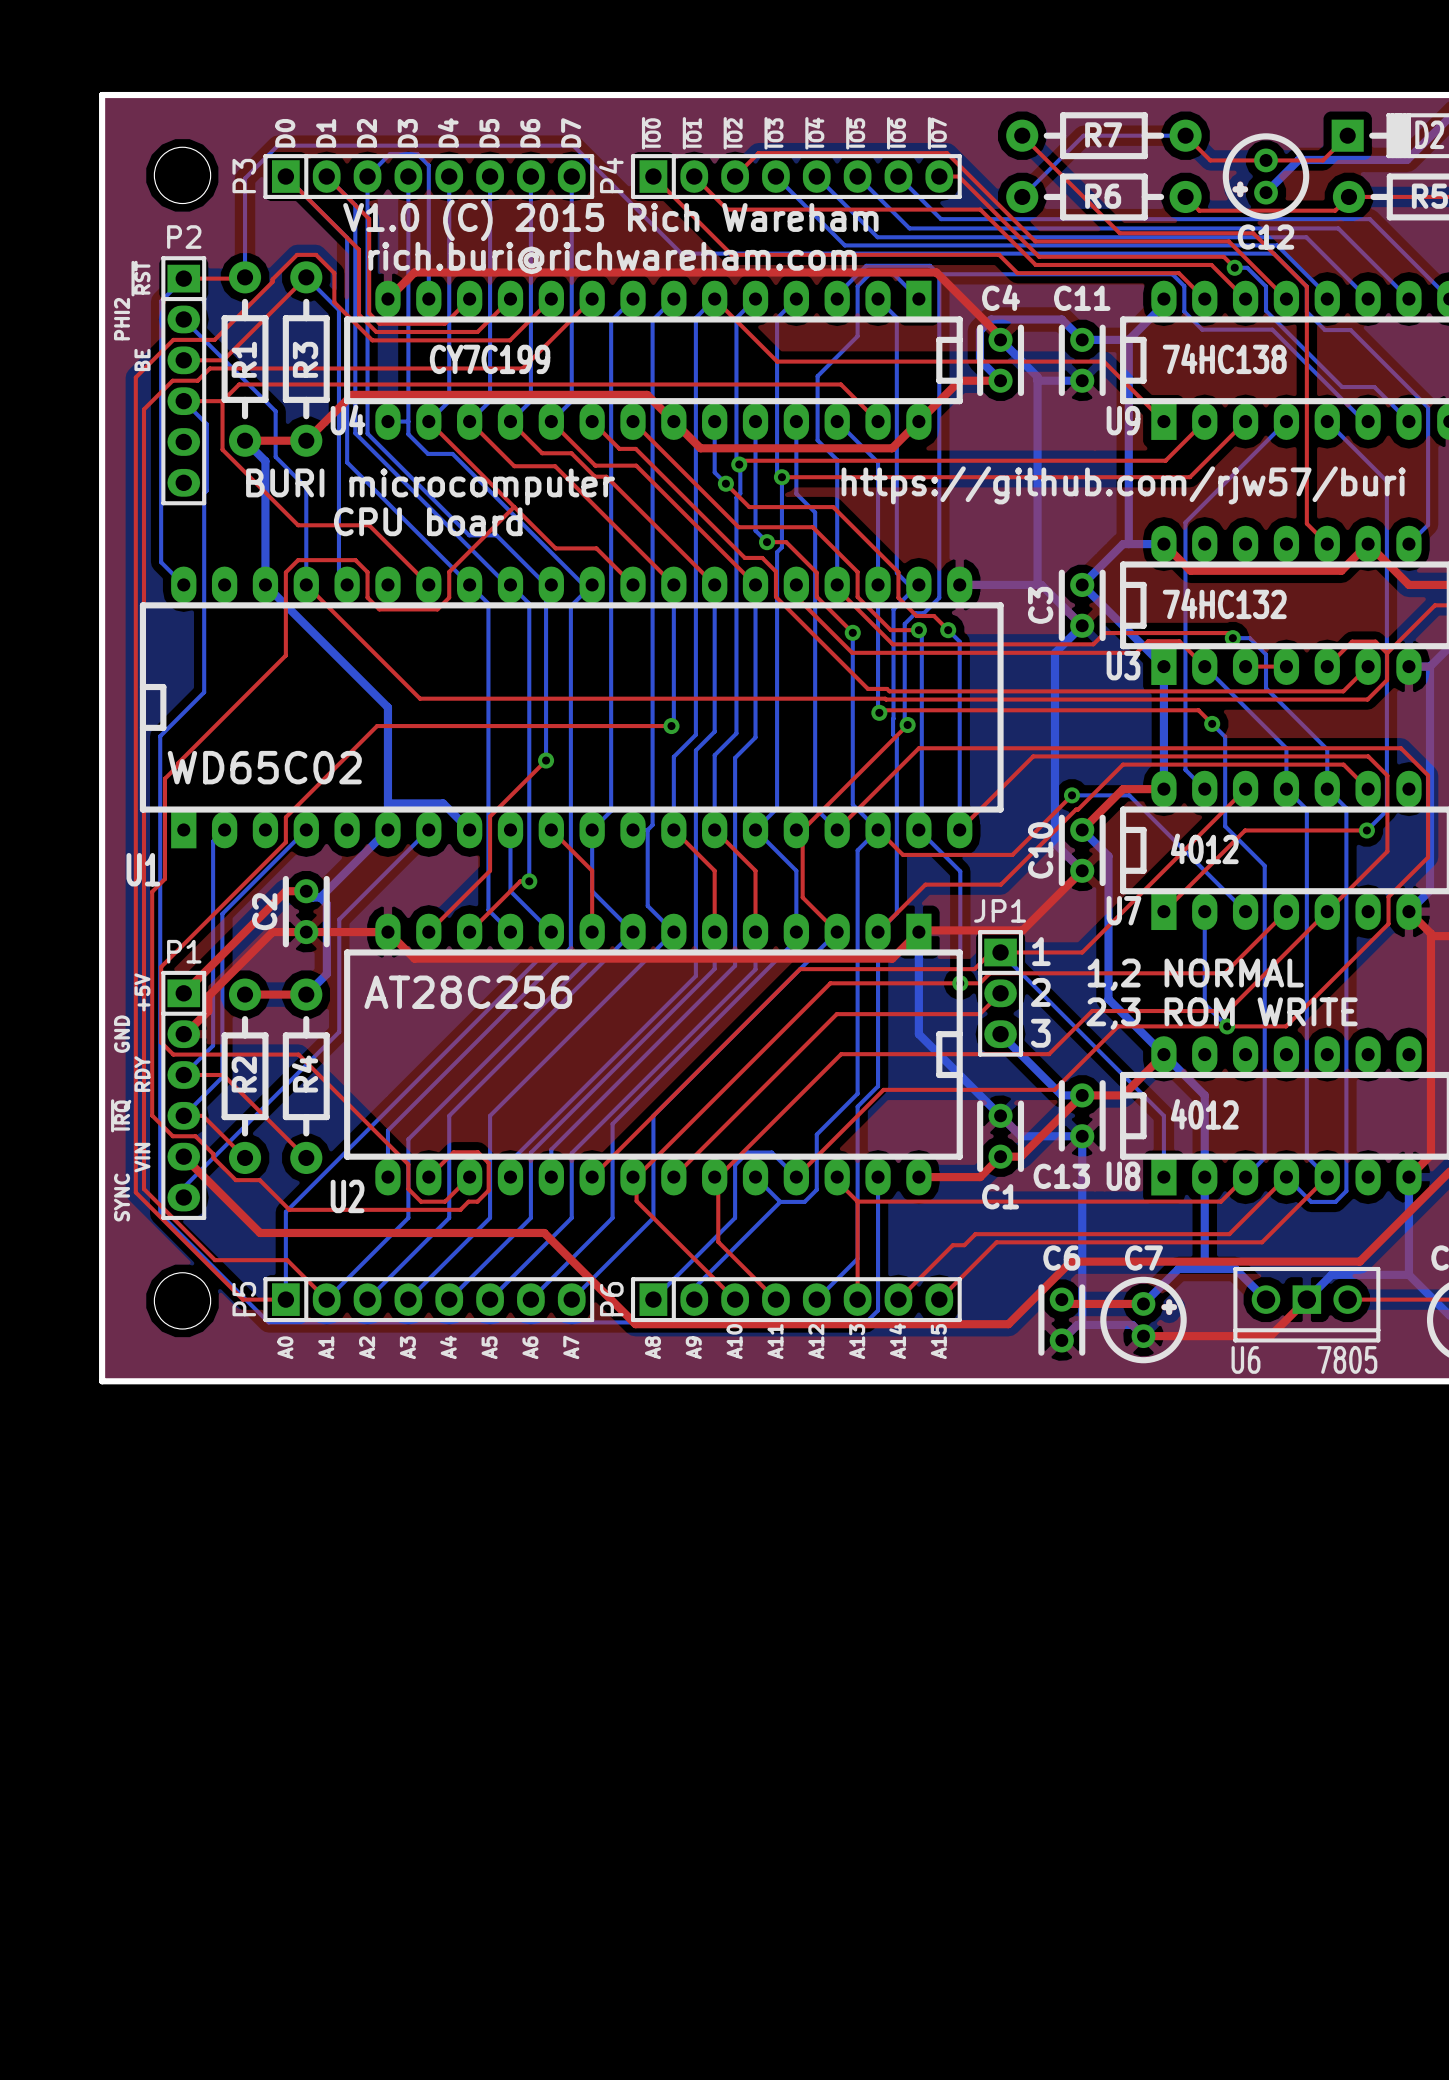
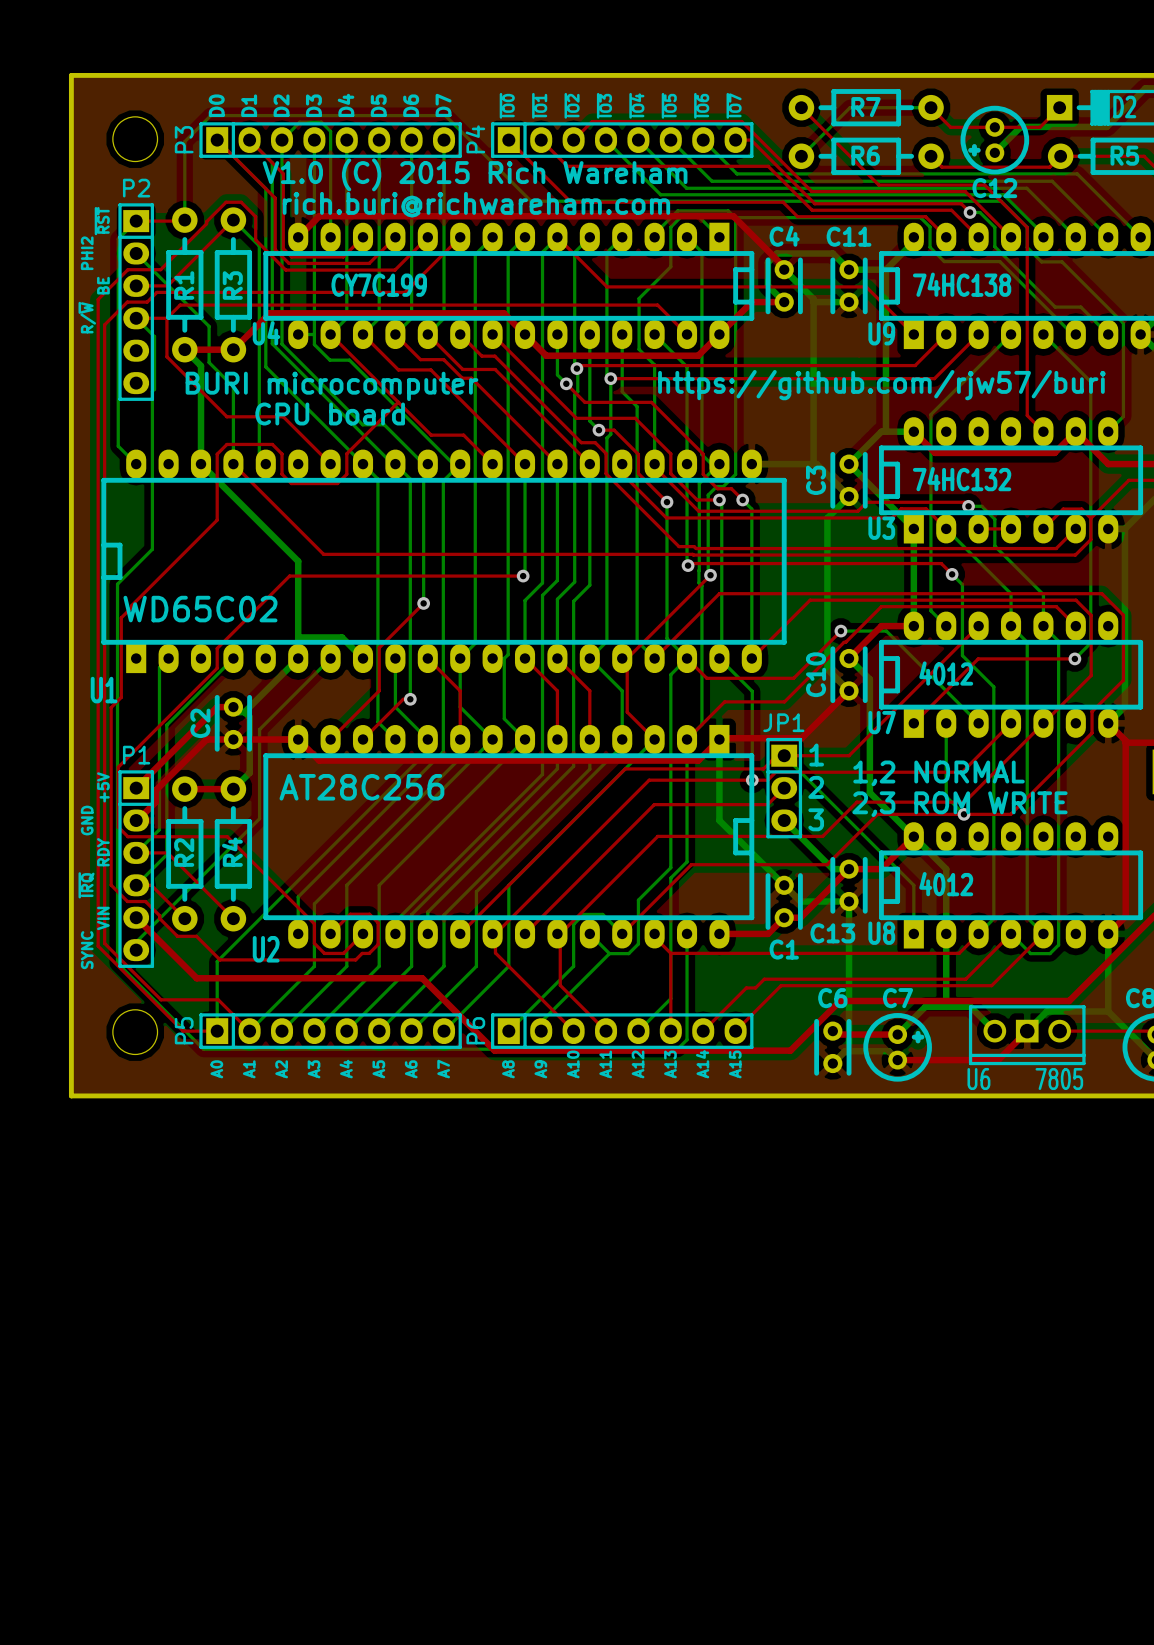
text: none -> R/~{W} (87, 317)

